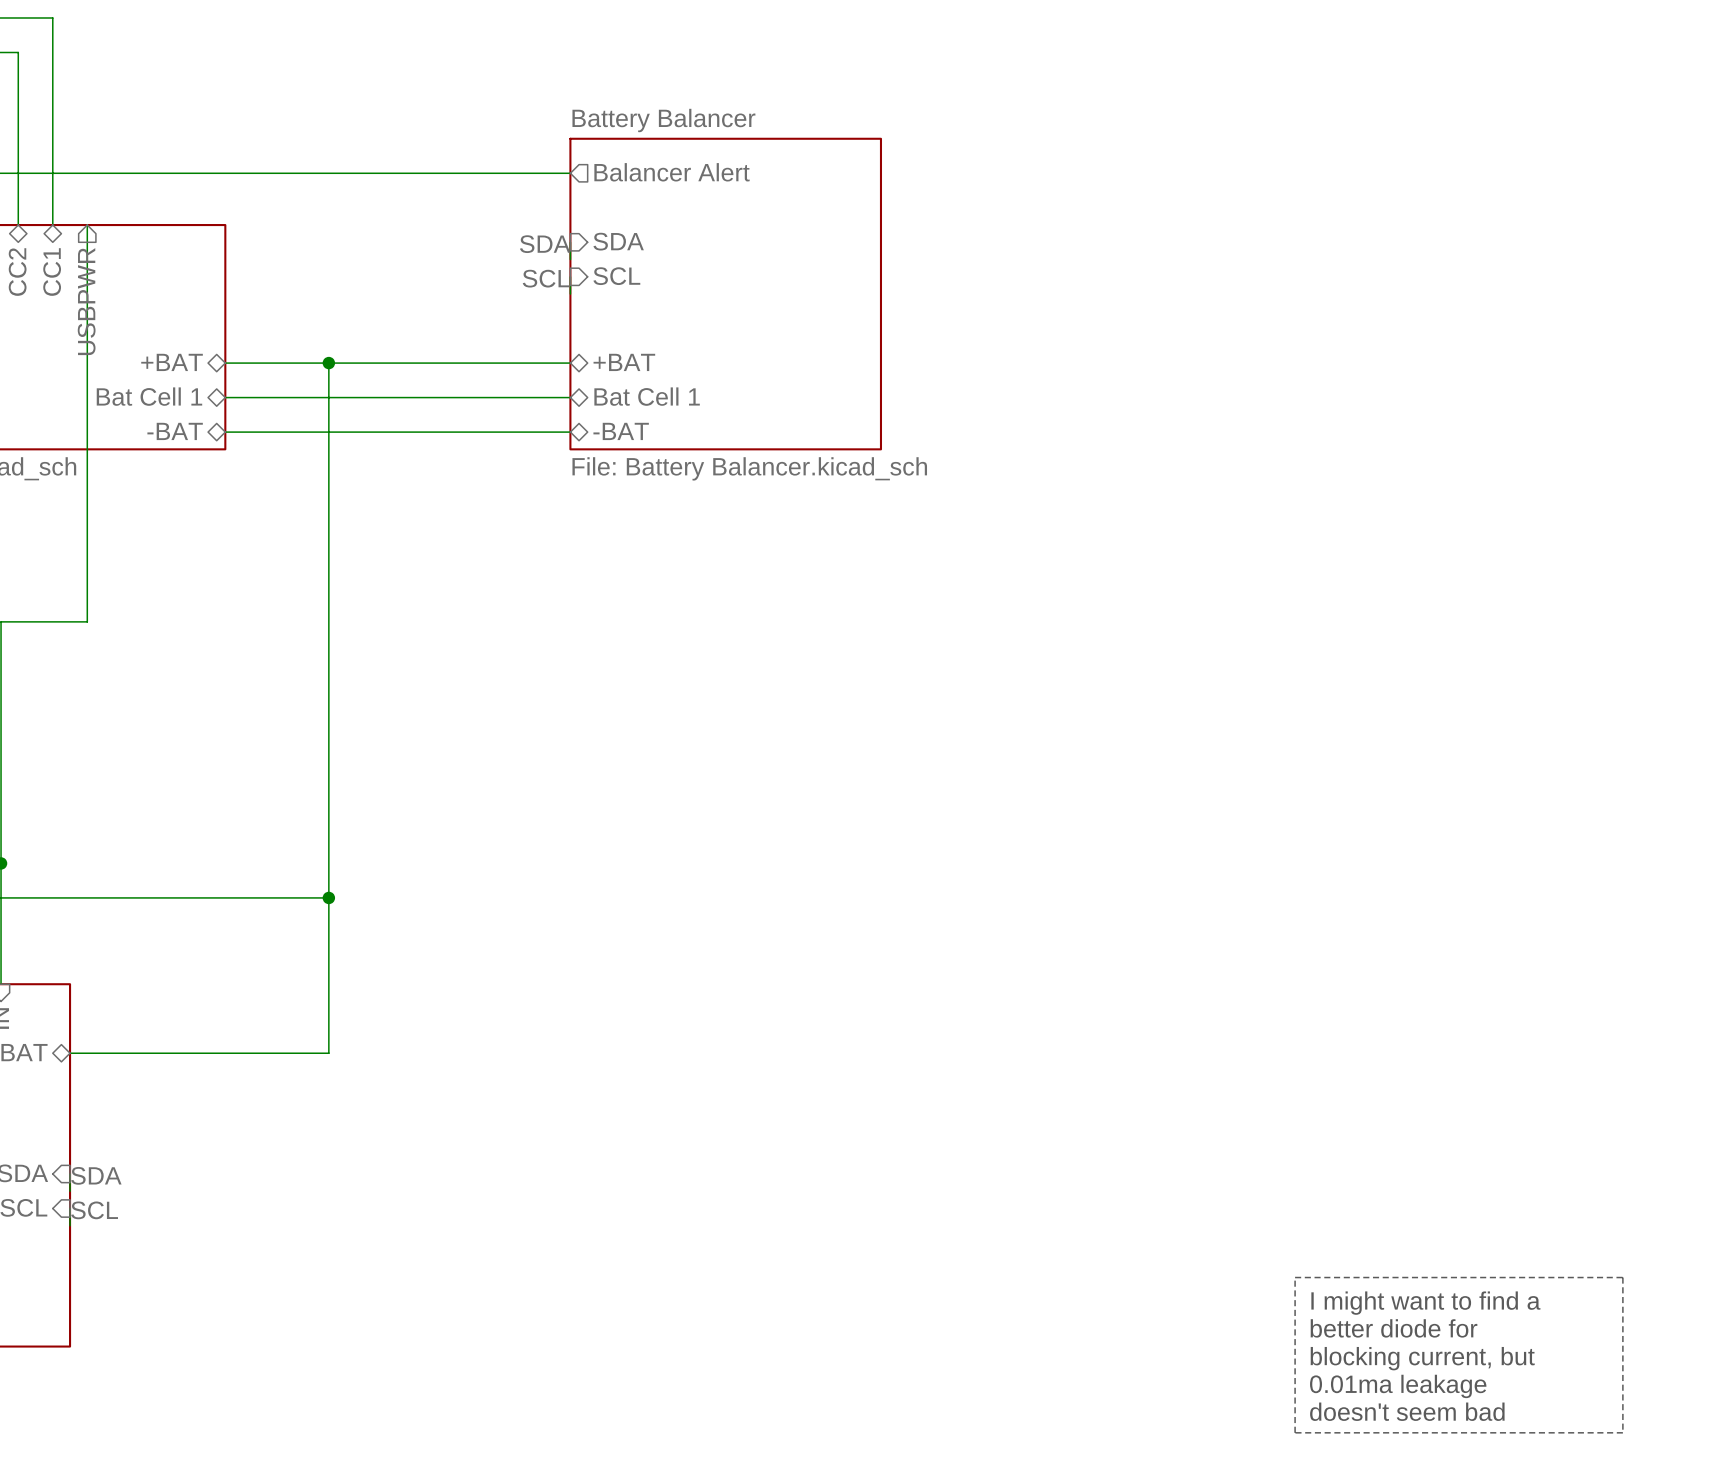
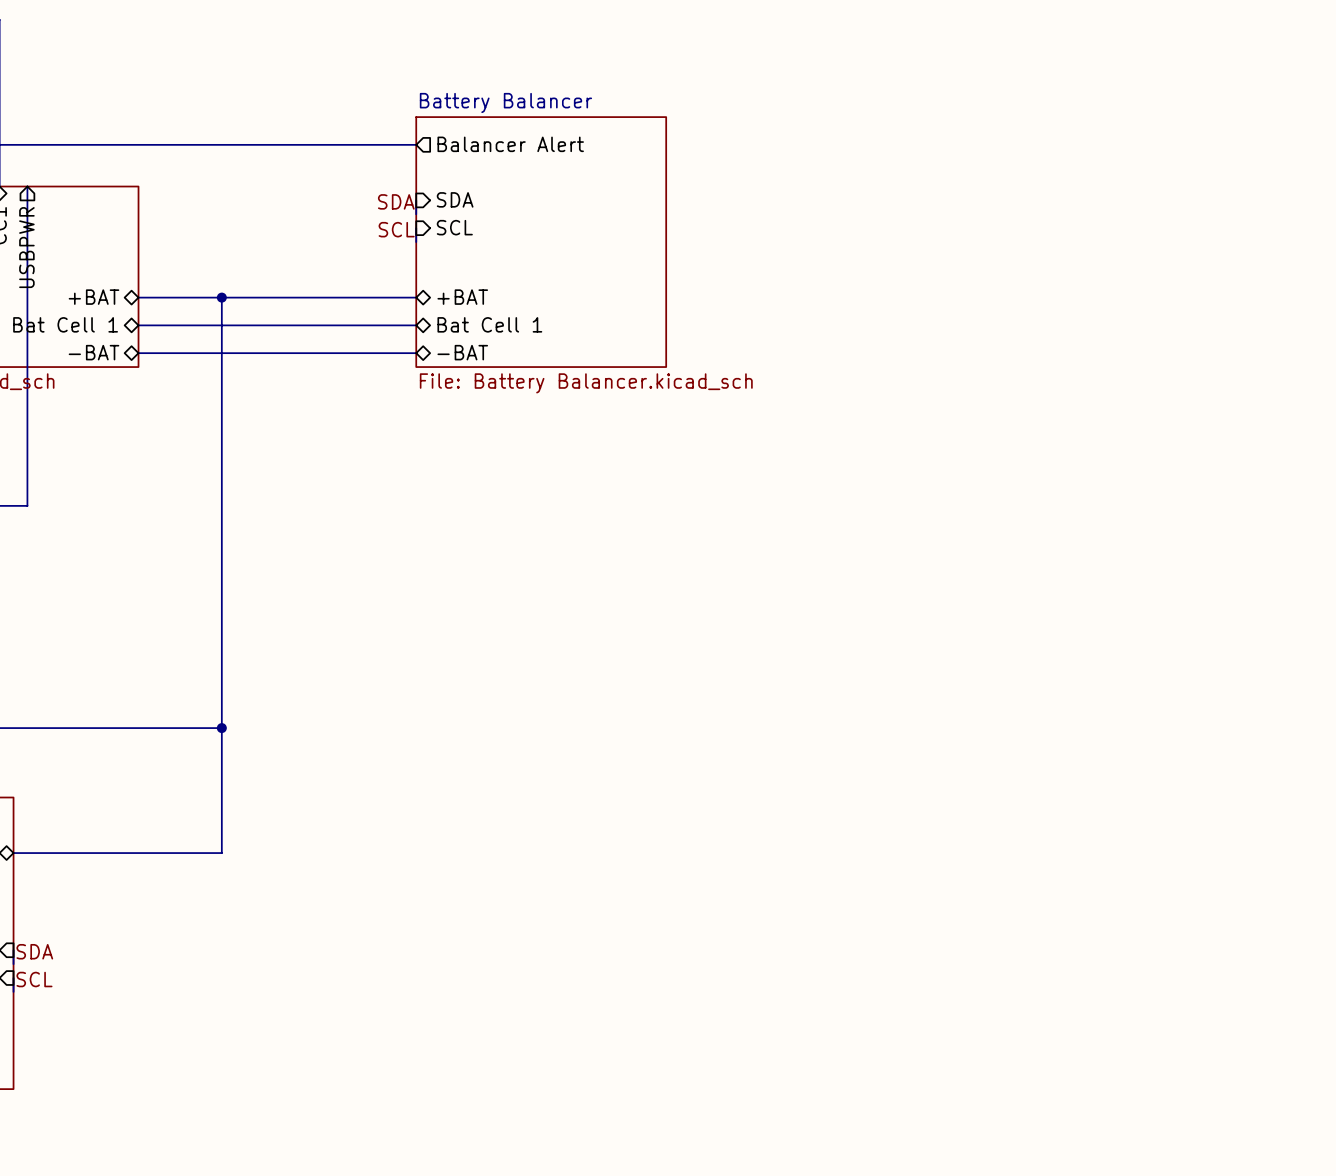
line: (1295, 1277) (1622, 1277) (1622, 1432) (1295, 1432) (1295, 1277) -> none
text: I might want to find a (1425, 1303) -> none
text: better diode for (1394, 1328) -> none
text: blocking current, but (1422, 1358) -> none
text: 0.01ma leakage (1398, 1386) -> none
text: doesn't seem bad (1407, 1411) -> none

